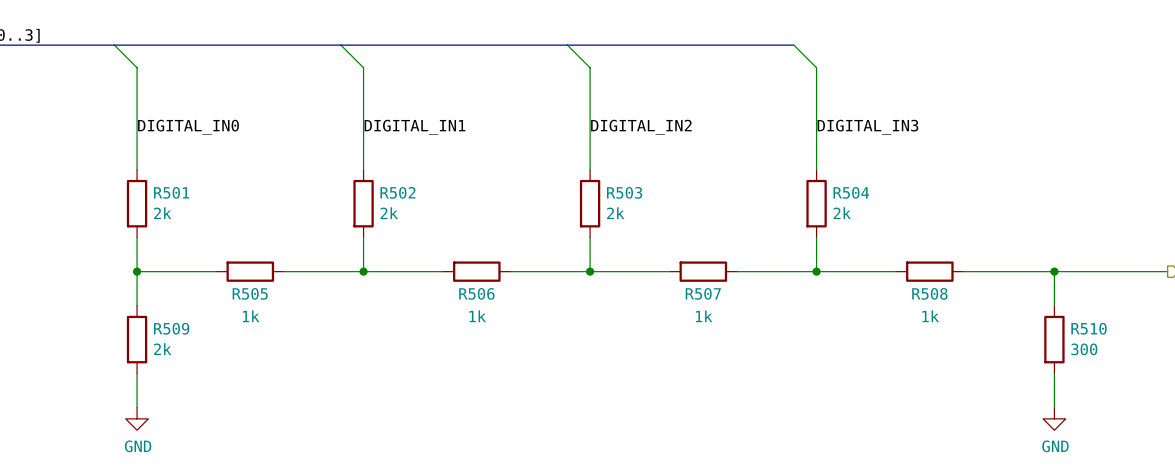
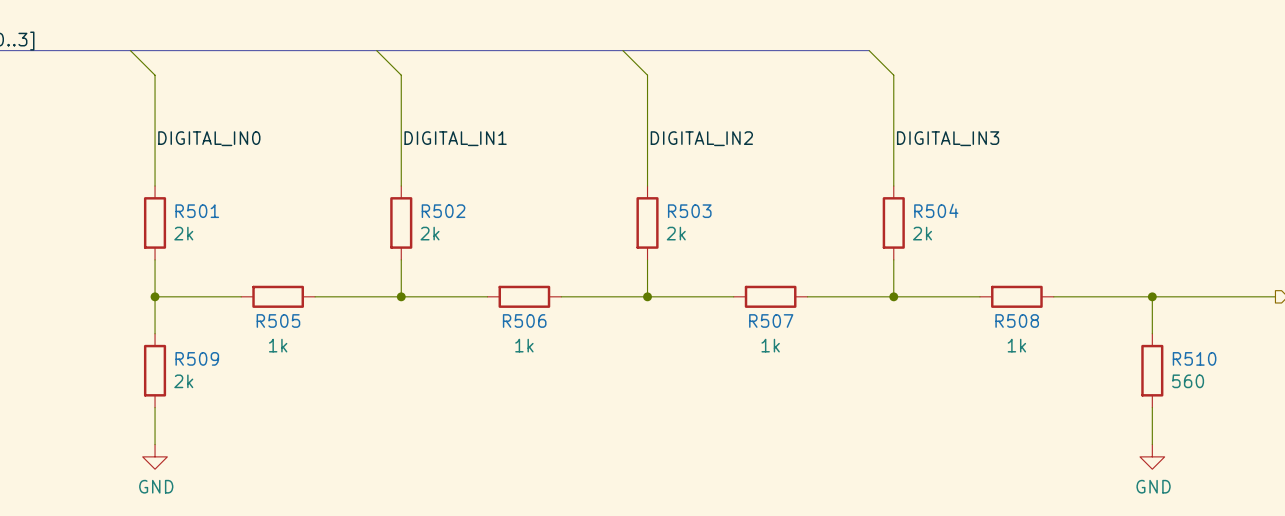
R510 value: 300 (1084, 349) -> 560 (1188, 381)

